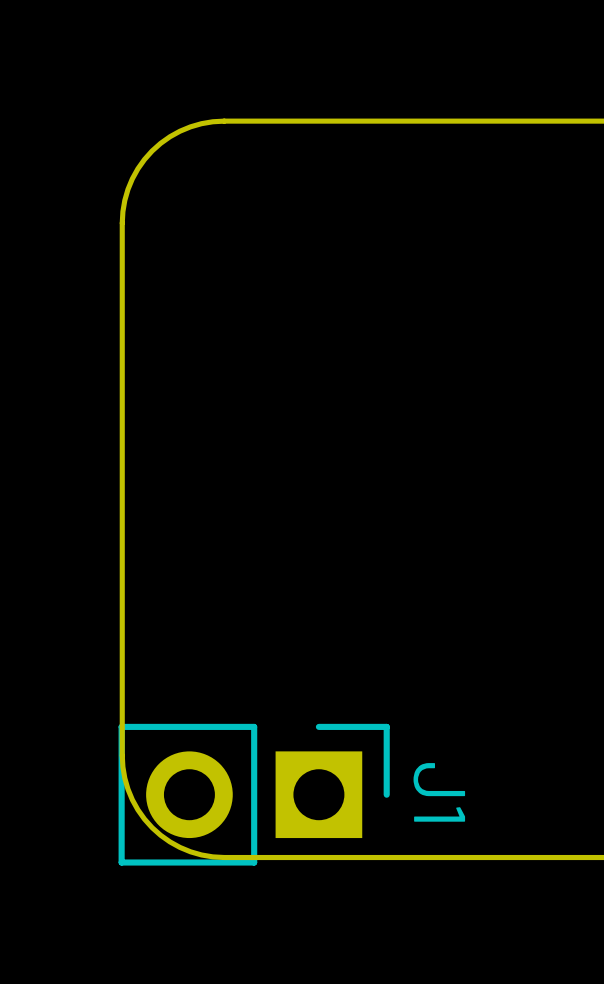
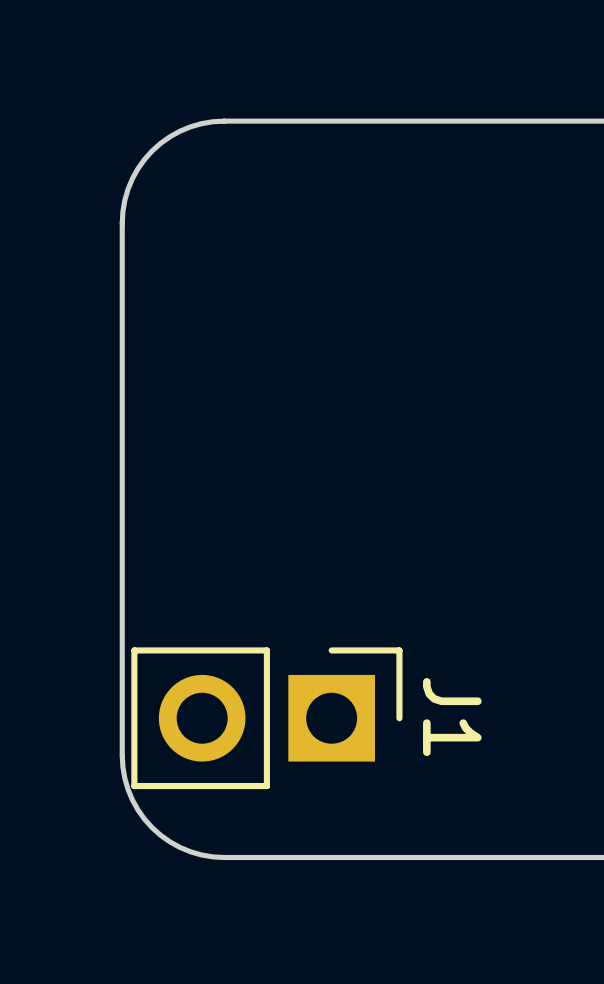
J1 position: (254, 794) -> (266, 718)

